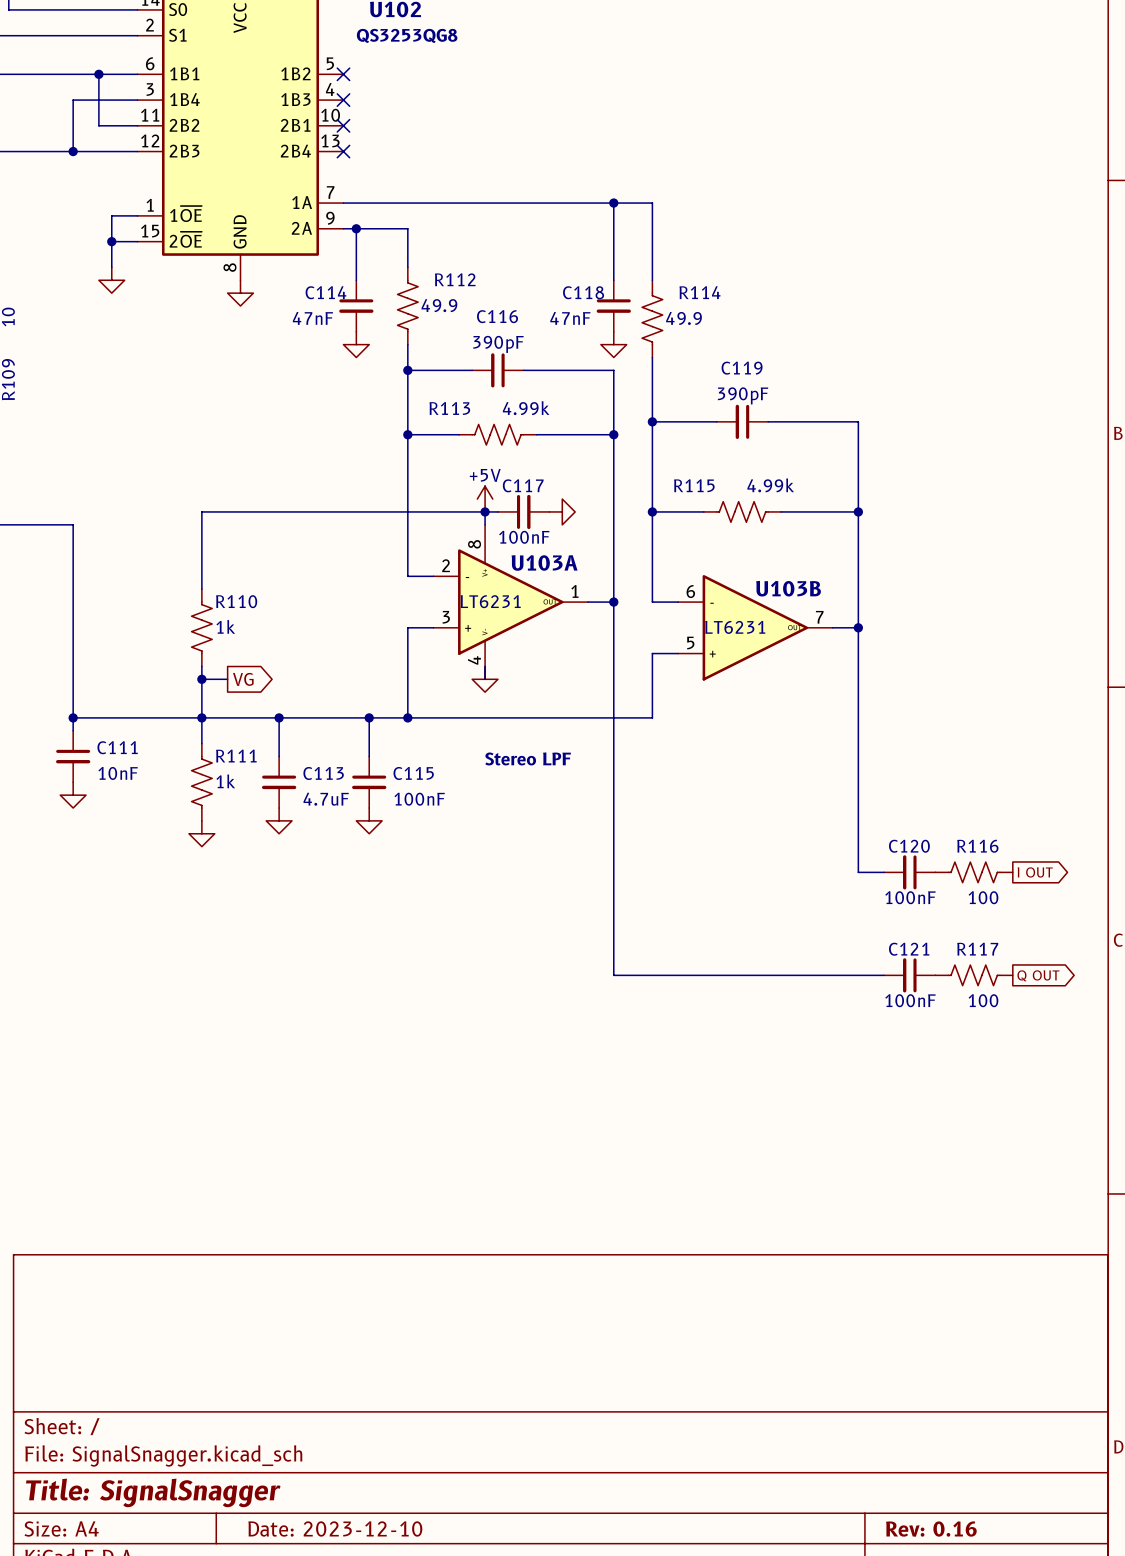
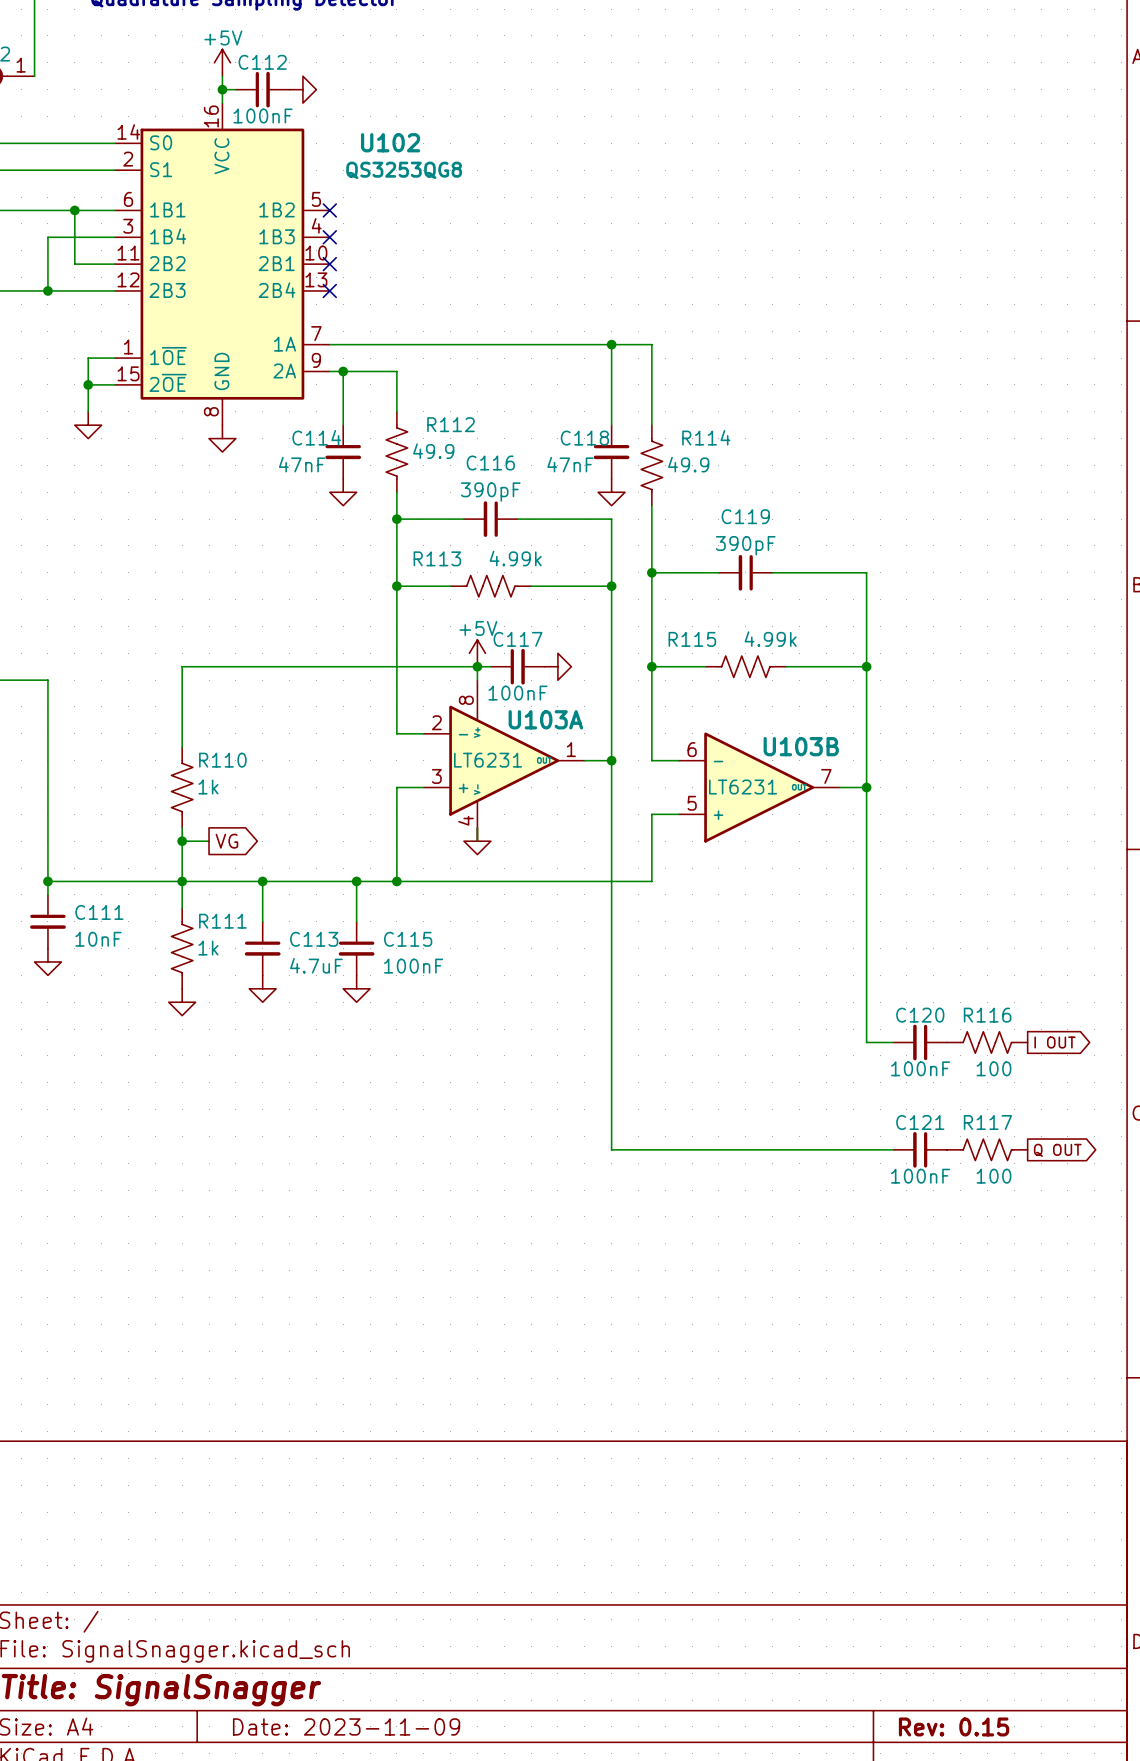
text: Stereo LPF (528, 758) -> none
title block: Date: 2023-12-10 (335, 1528) -> Date: 2023-11-09 (346, 1726)
title block: Rev: 0.16 (931, 1529) -> Rev: 0.15 (954, 1726)

